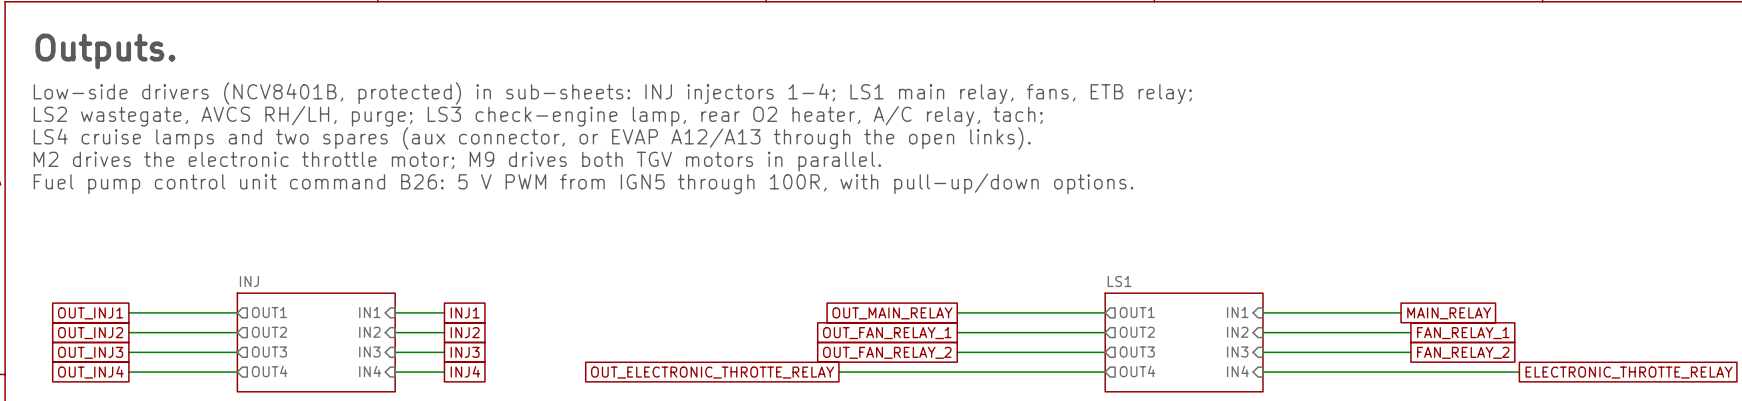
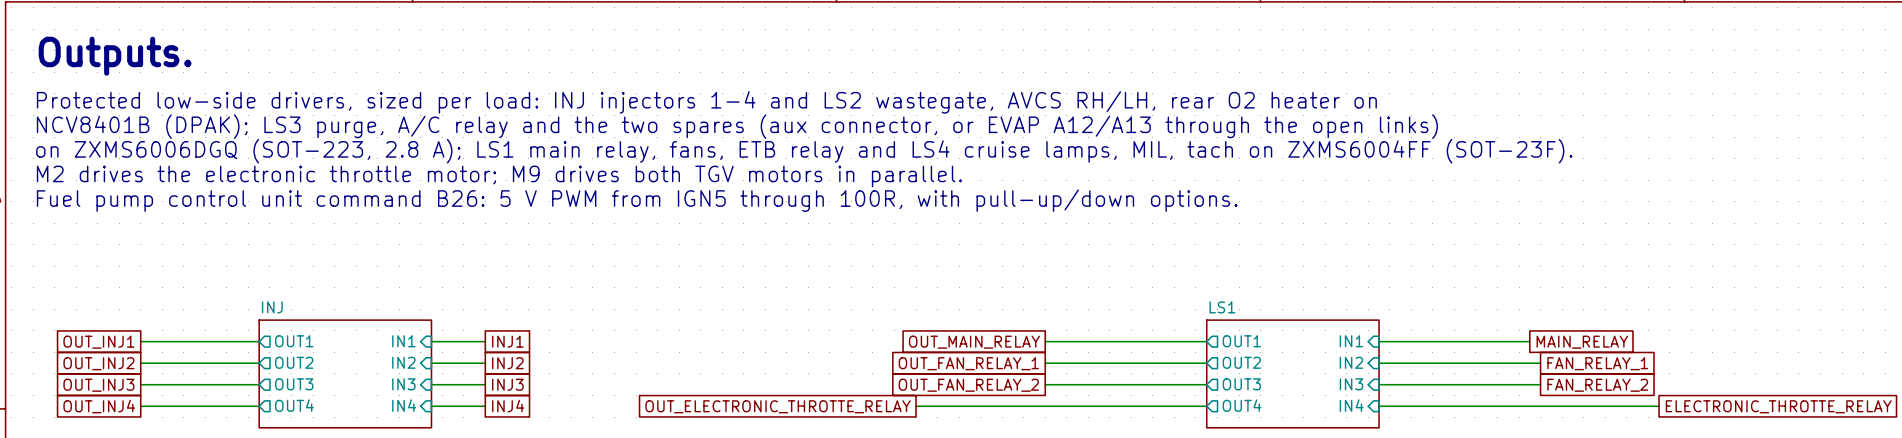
text: Low-side drivers (NCV8401B, protected) in sub-sheets: INJ injectors 1-4; LS1 main relay, fans, ETB relay; (612, 93) -> Protected low-side drivers, sized per load: INJ injectors 1-4 and LS2 wastegate, AVCS RH/LH, rear O2 heater on (706, 102)
text: LS2 wastegate, AVCS RH/LH, purge; LS3 check-engine lamp, rear O2 heater, A/C relay, tach; (538, 116) -> NCV8401B (DPAK); LS3 purge, A/C relay and the two spares (aux connector, or EVAP A12/A13 through the open links) (737, 126)
text: LS4 cruise lamps and two spares (aux connector, or EVAP A12/A13 through the open links). (532, 138) -> on ZXMS6006DGQ (SOT-223, 2.8 A); LS1 main relay, fans, ETB relay and LS4 cruise lamps, MIL, tach on ZXMS6004FF (SOT-23F). (804, 151)

